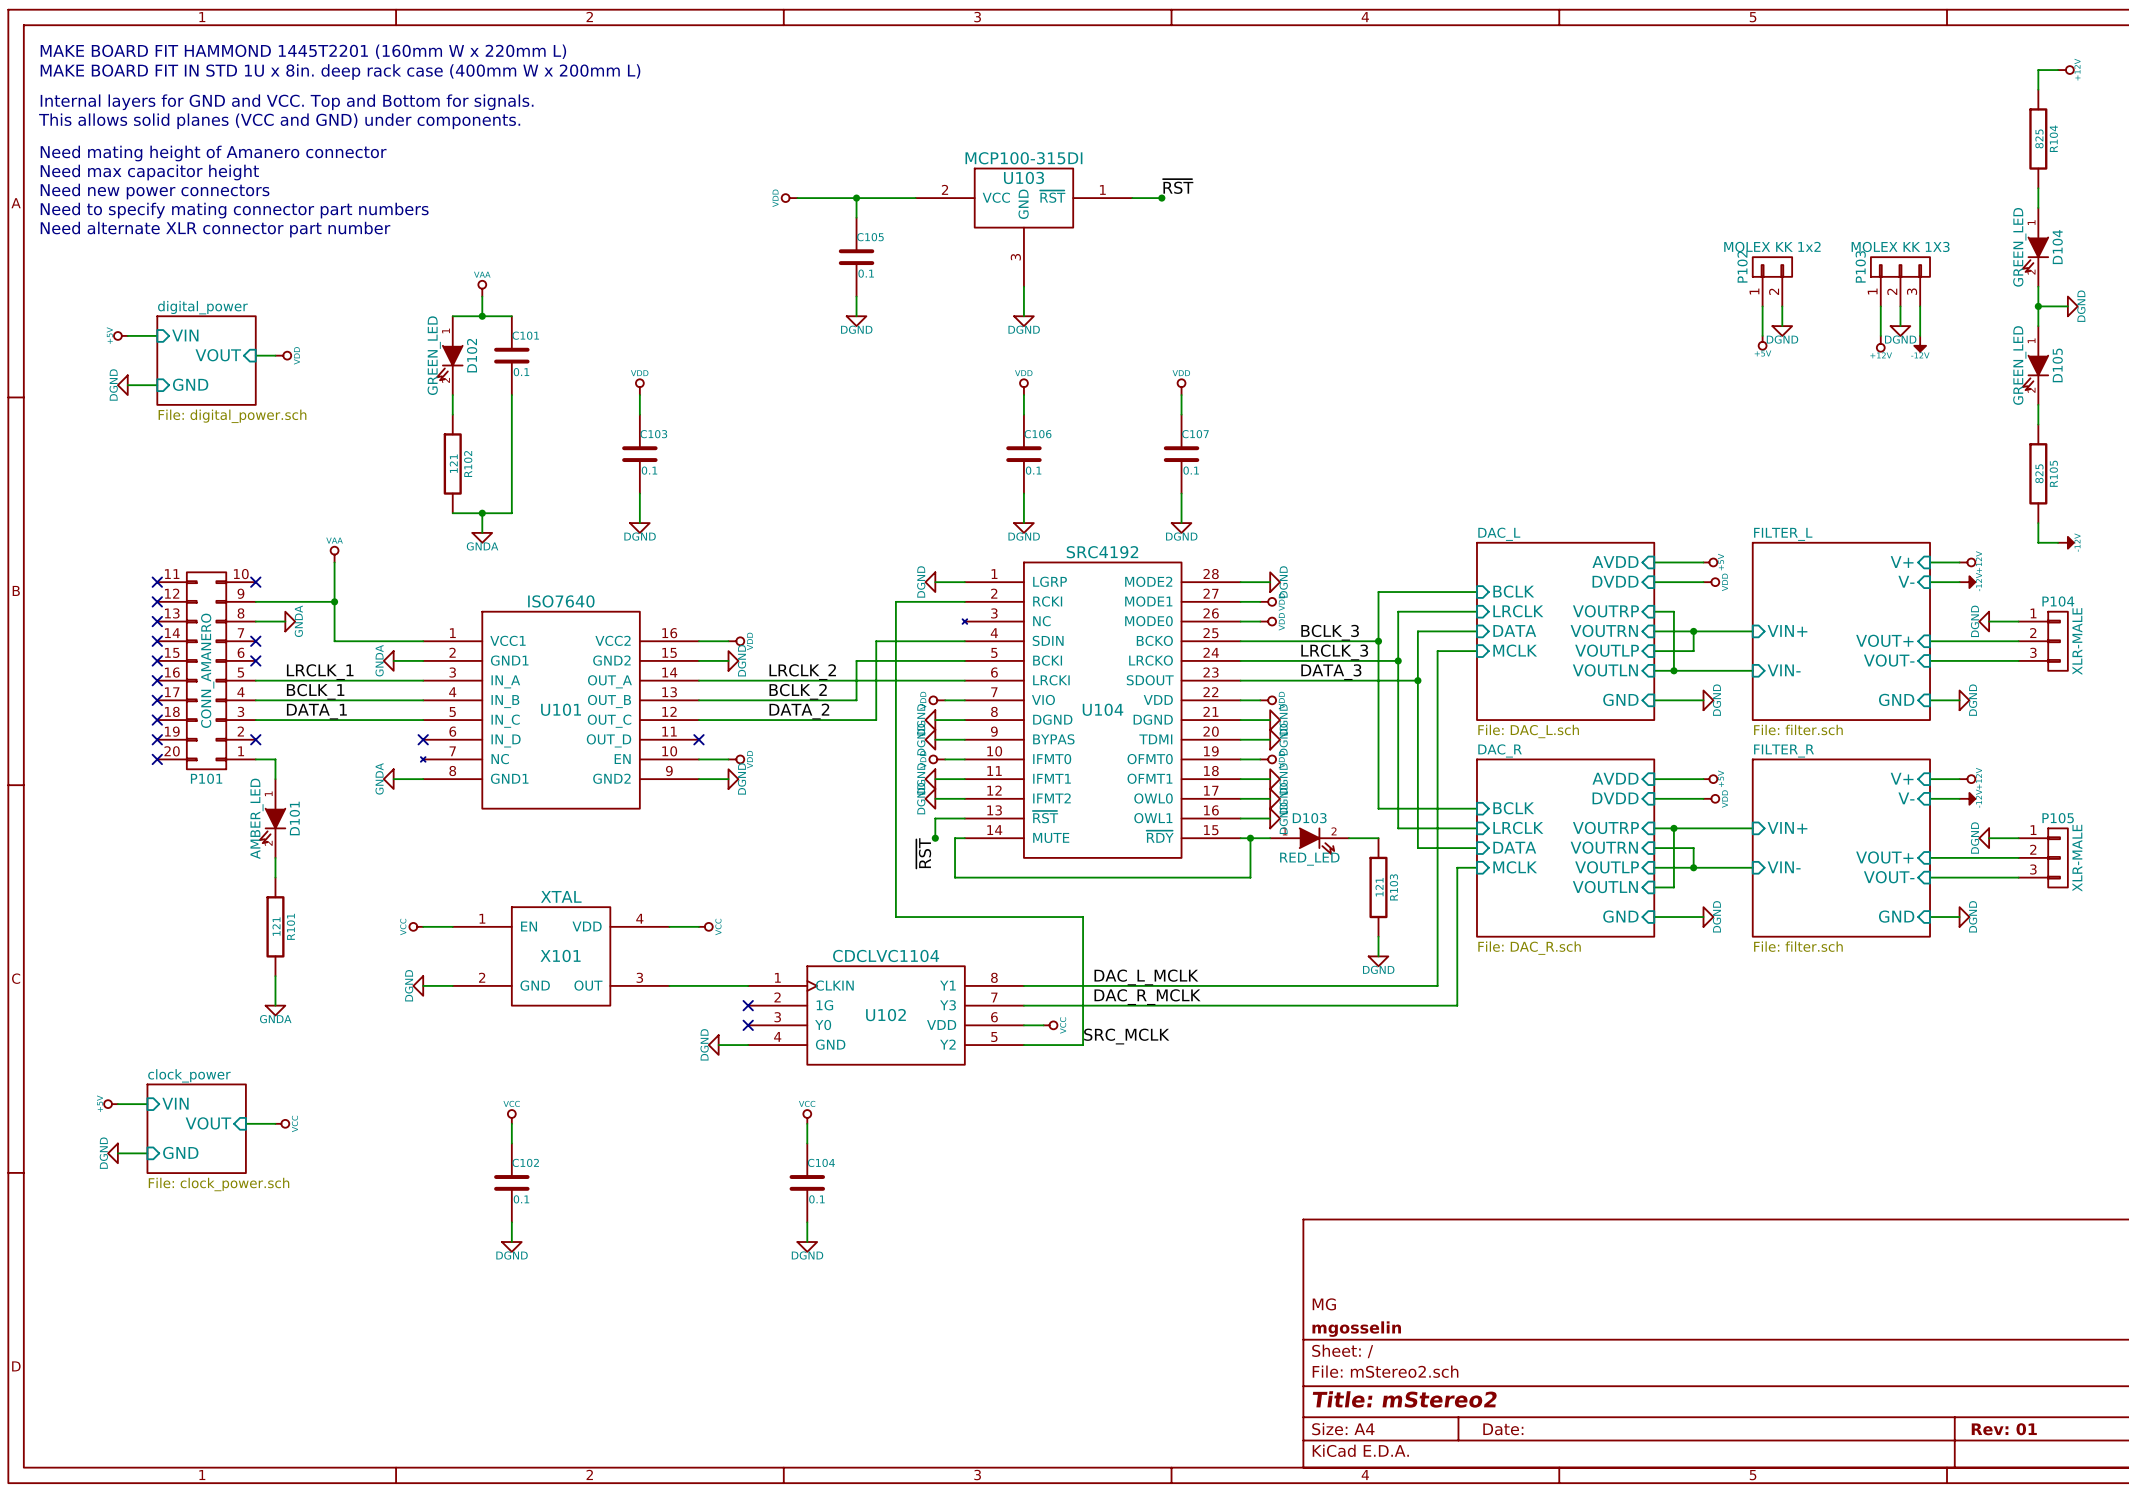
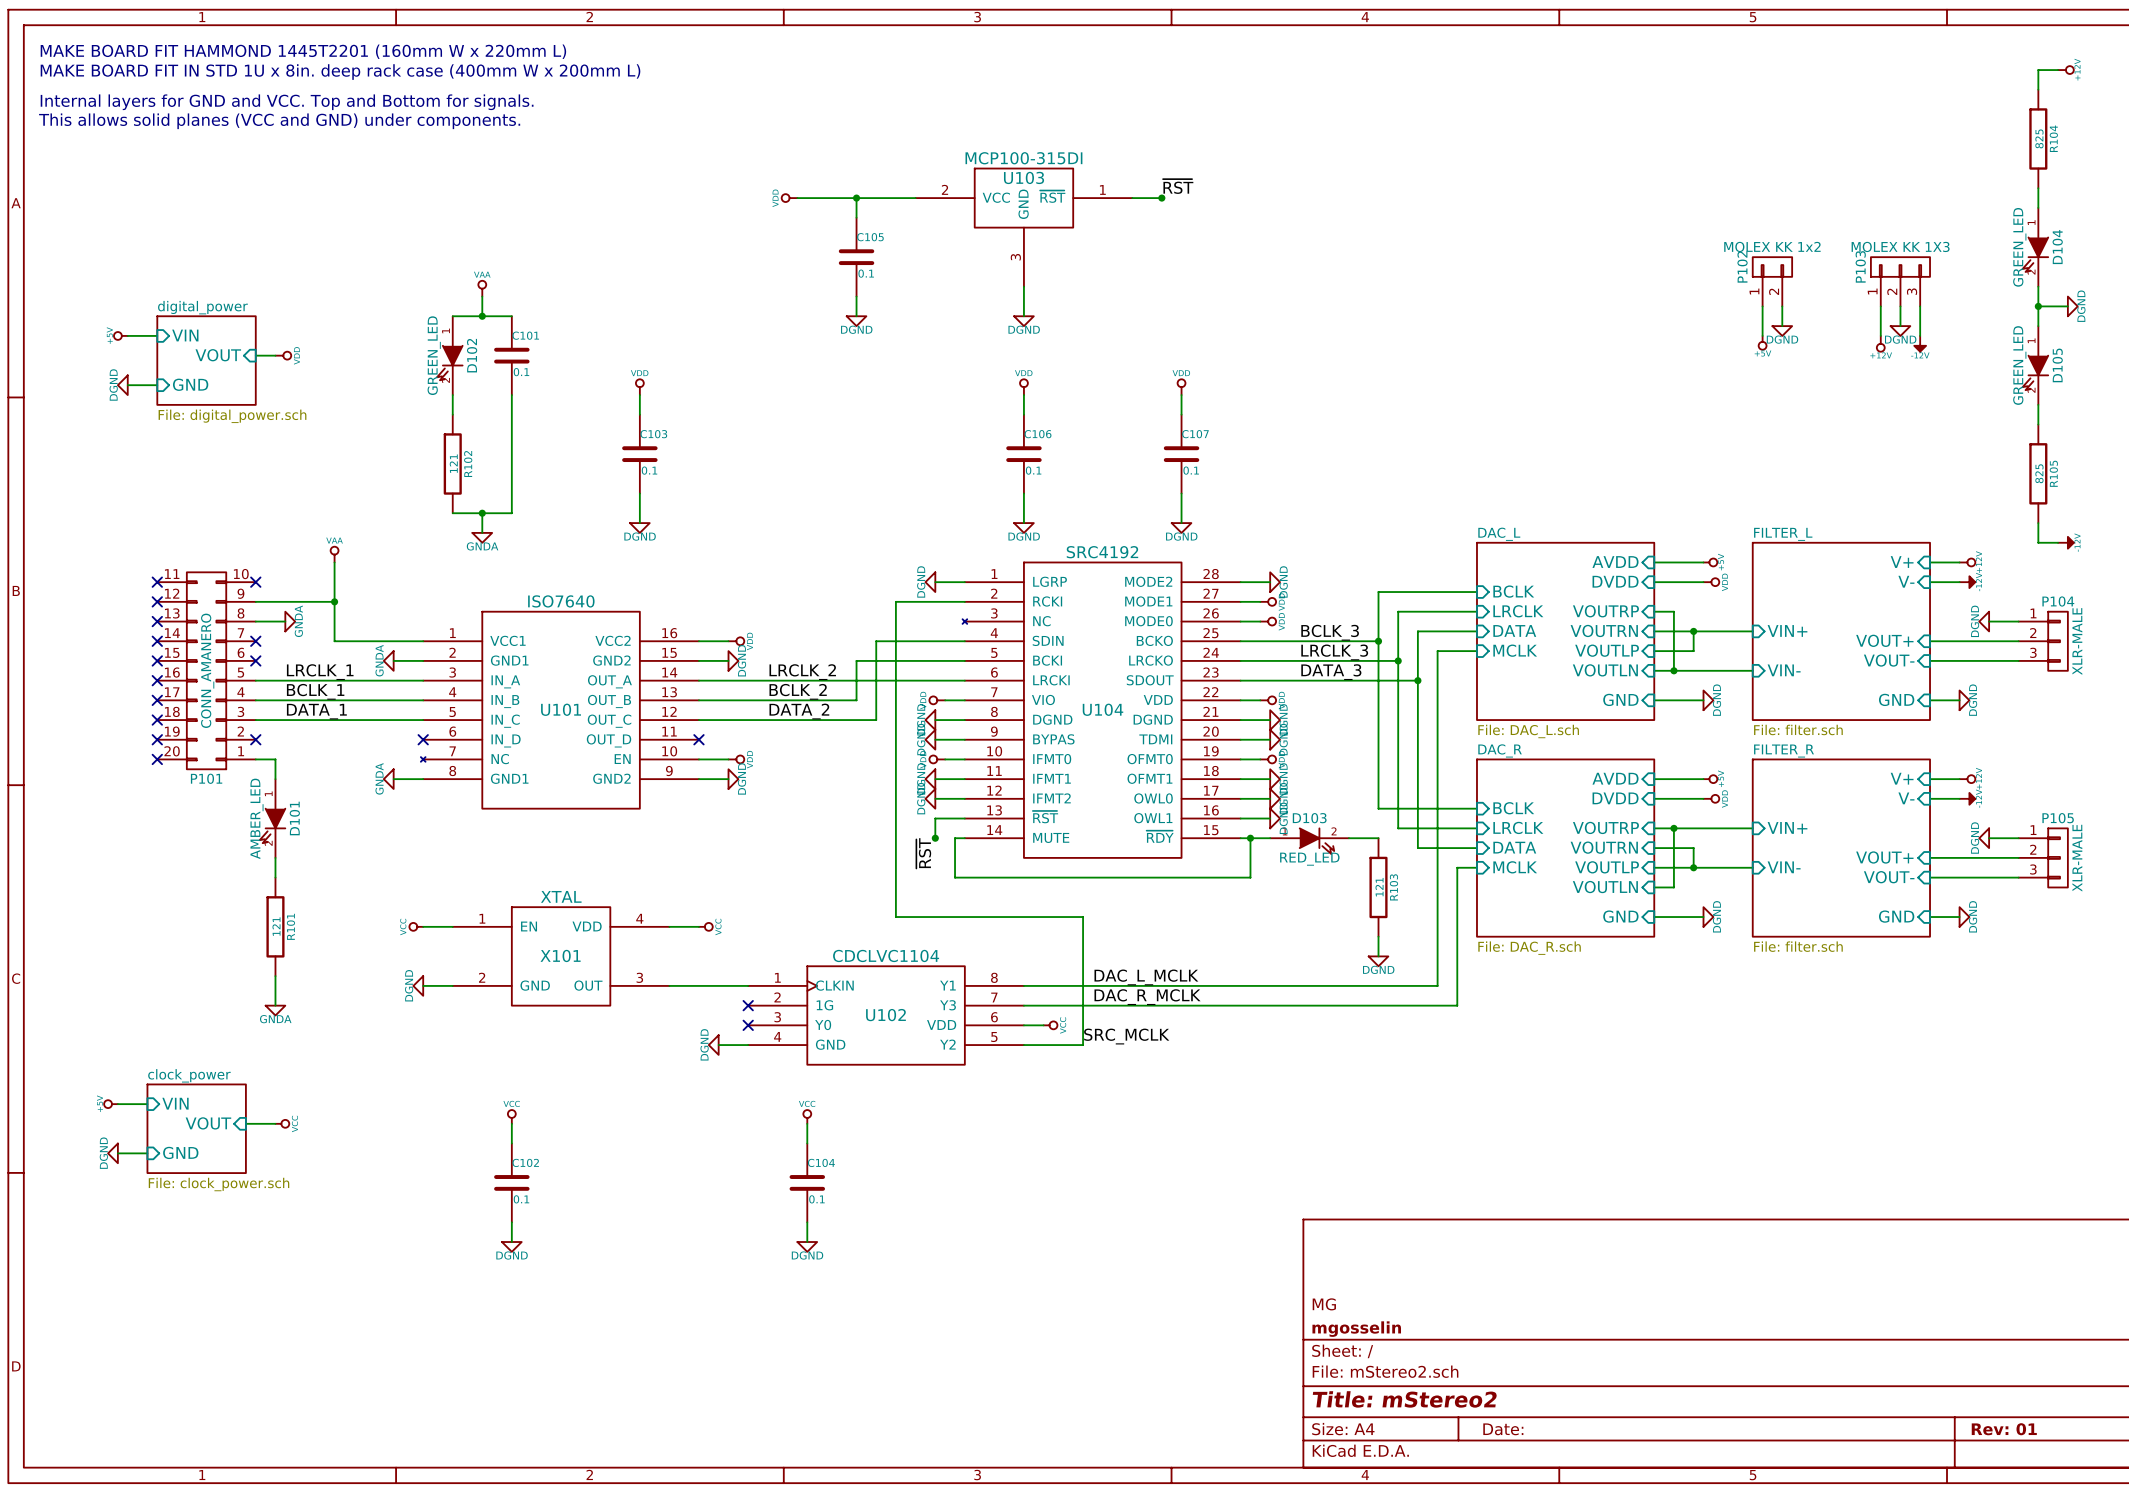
text: Need mating height of Amanero connector (213, 153) -> none
text: Need max capacitor height (149, 172) -> none
text: Need new power connectors (155, 191) -> none
text: Need to specify mating connector part numbers (234, 210) -> none
text: Need alternate XLR connector part number (215, 229) -> none

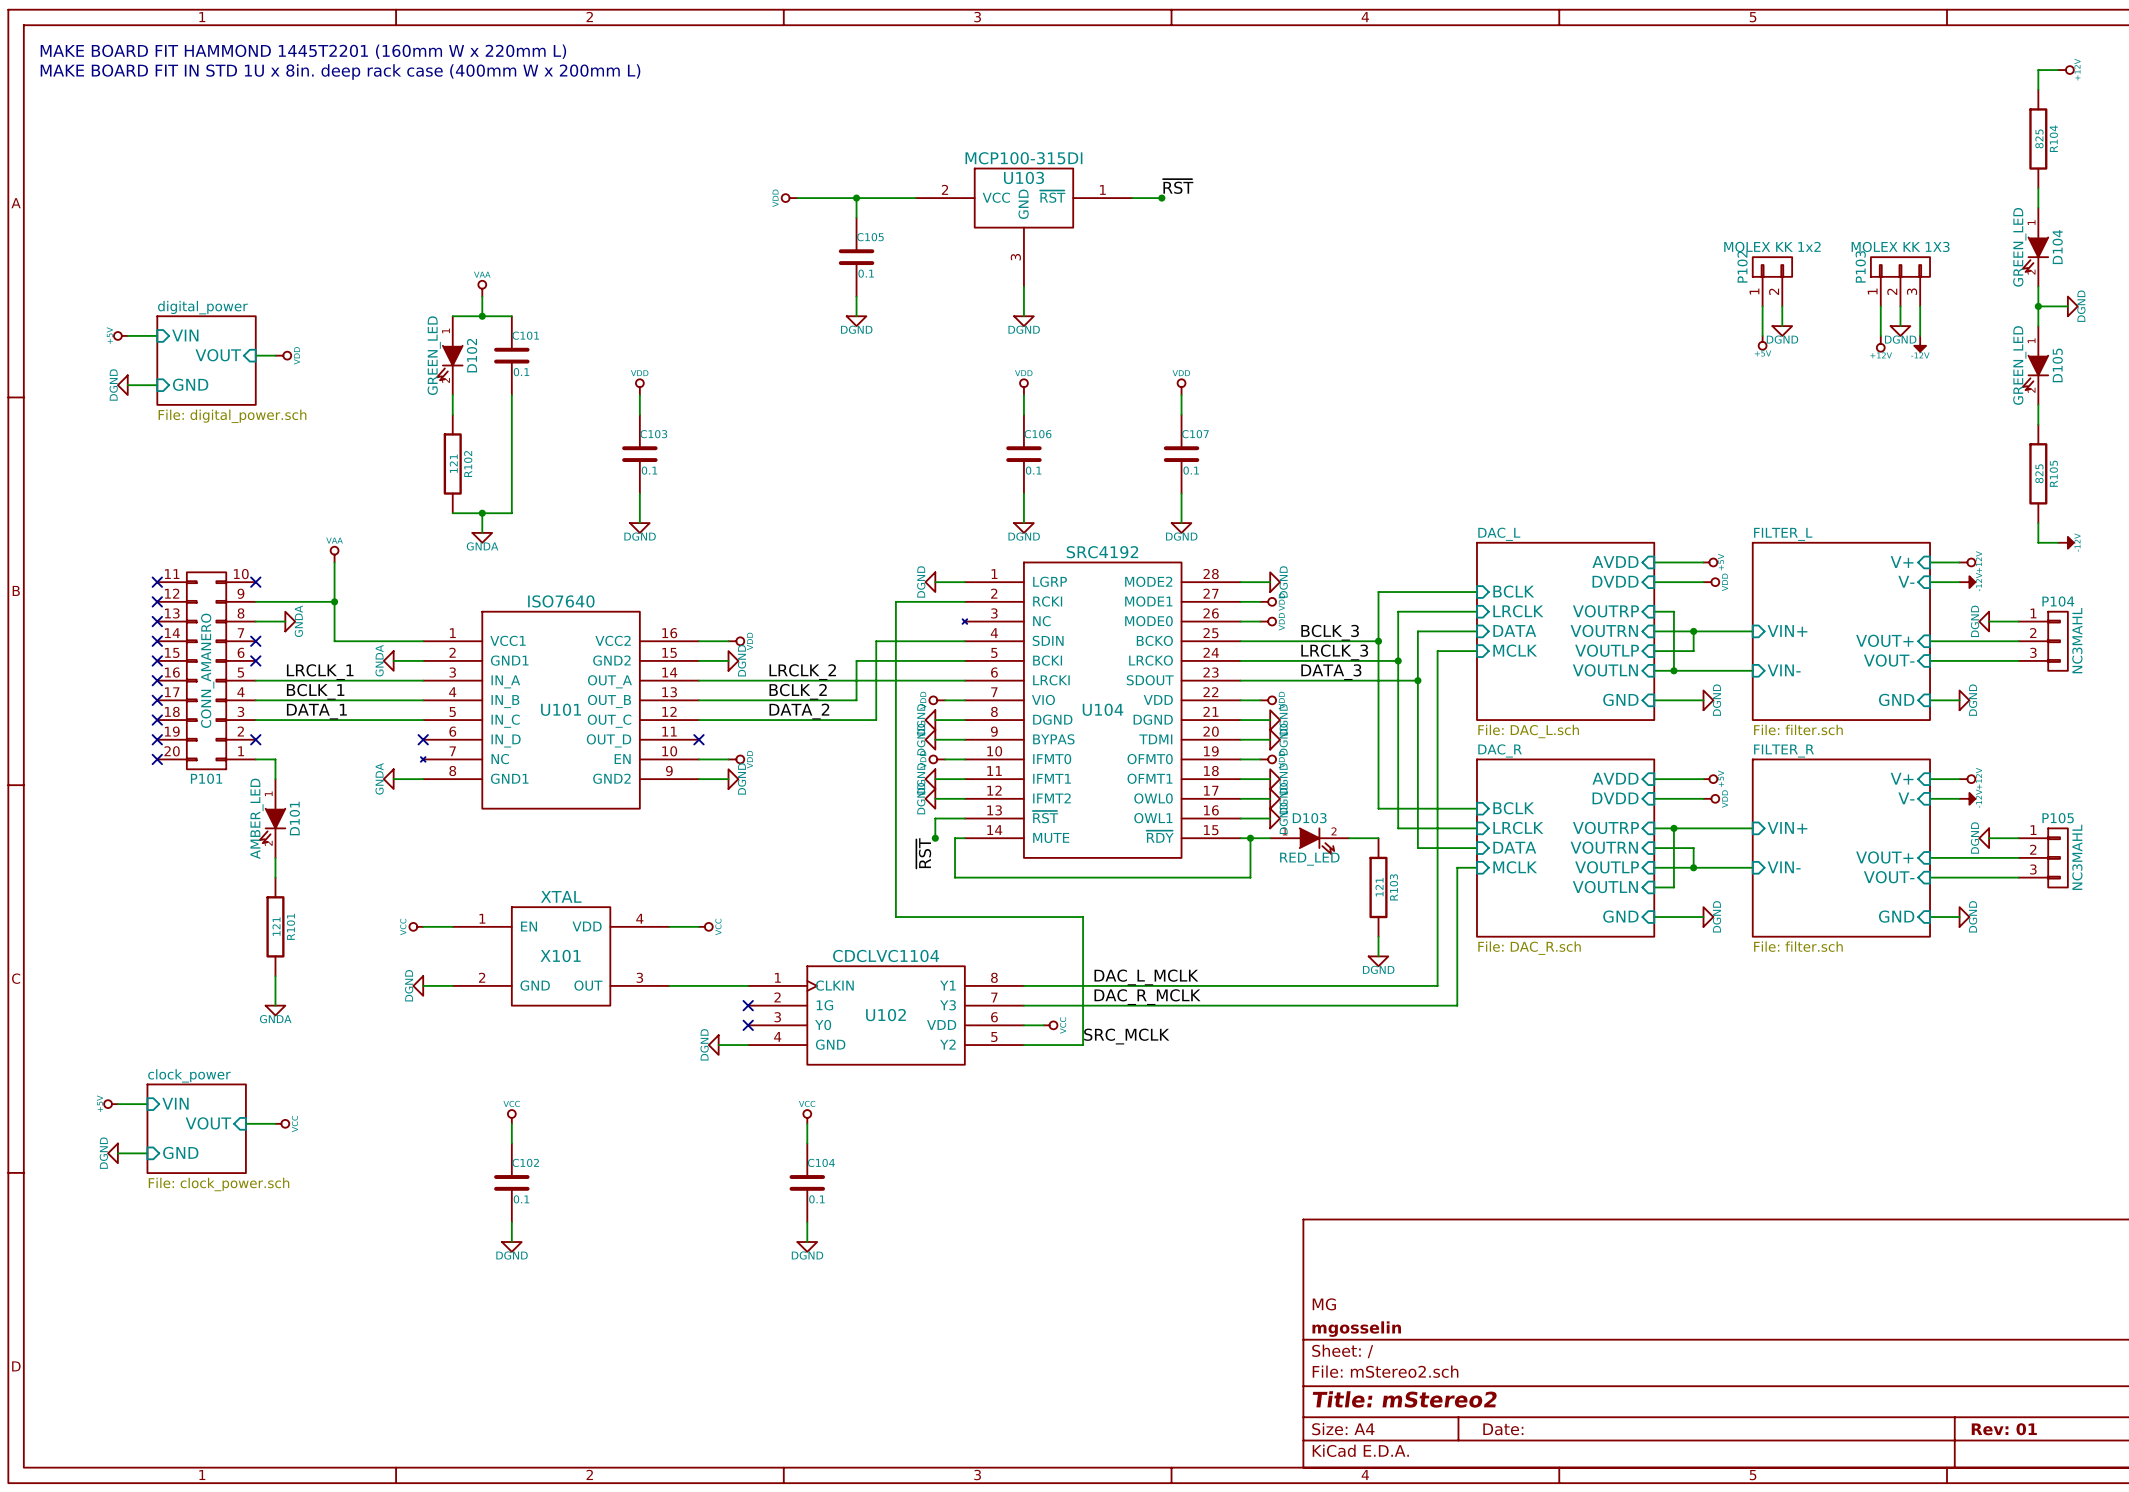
text: Internal layers for GND and VCC. Top and Bottom for signals. (287, 102) -> none
text: This allows solid planes (VCC and GND) under components. (279, 121) -> none
P104 value: XLR-MALE (2077, 641) -> NC3MAHL (2077, 640)
P105 value: XLR-MALE (2077, 858) -> NC3MAHL (2077, 857)

